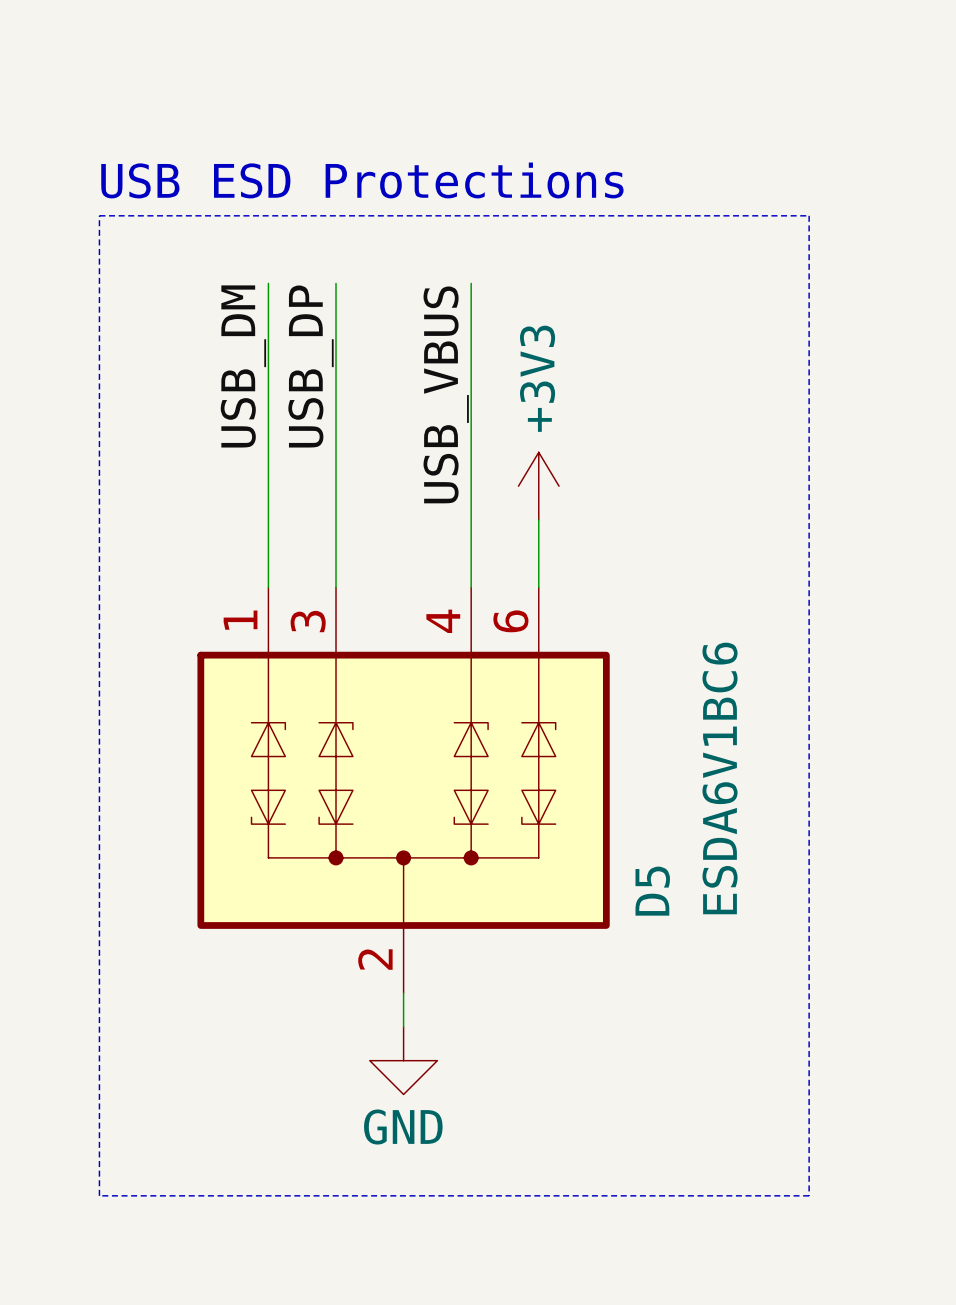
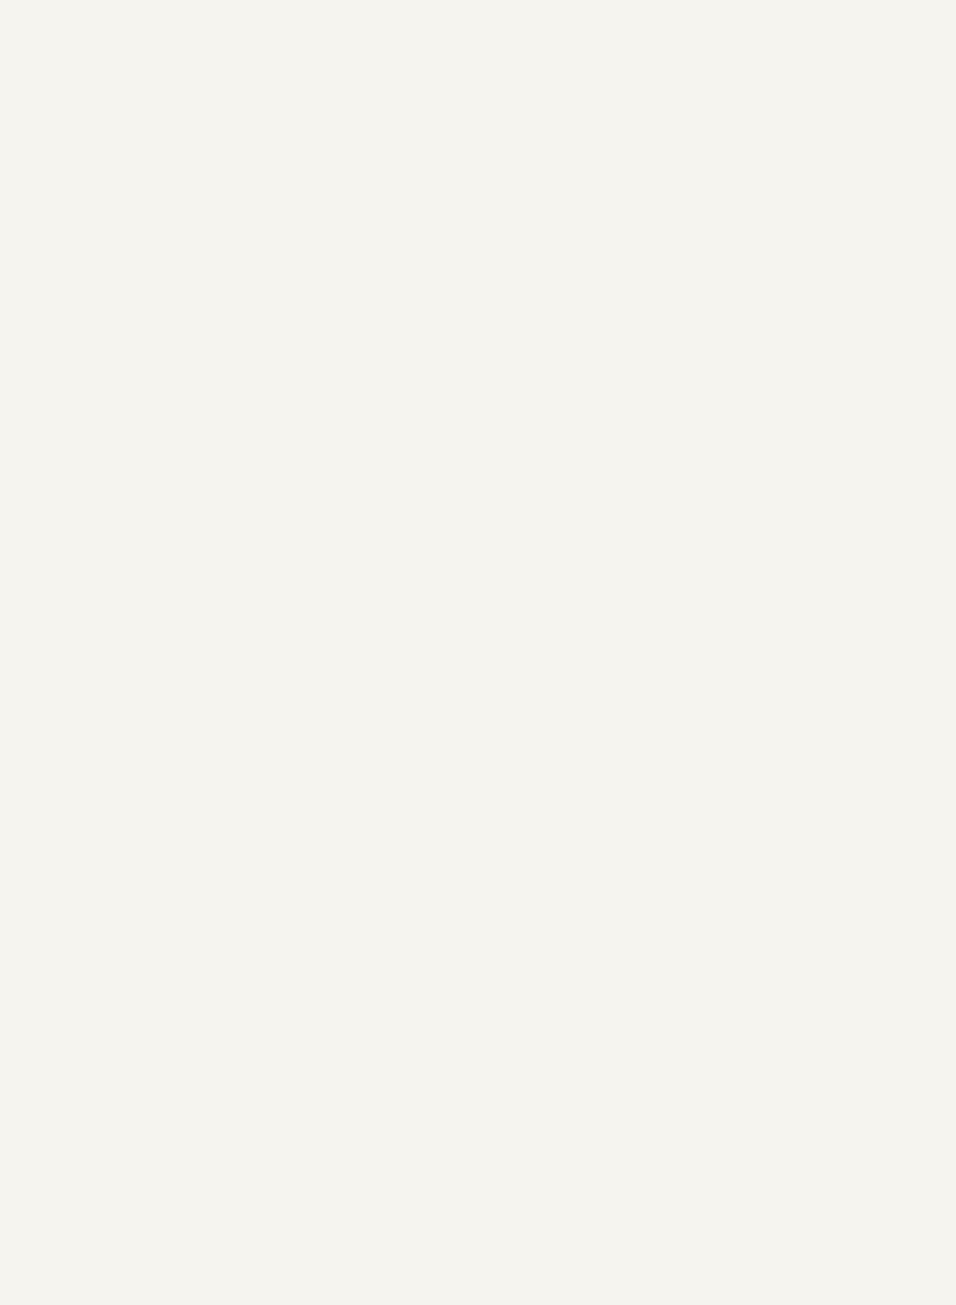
text: USB ESD Protections (362, 180) -> none
line: (99, 215) (809, 215) (809, 1195) (99, 1195) (99, 215) -> none
wire: (268, 283) (268, 587) -> none
wire: (336, 283) (336, 587) -> none
wire: (471, 283) (471, 587) -> none
label: USB_DM (243, 366) -> none
label: USB_DP (311, 366) -> none
label: USB_VBUS (446, 394) -> none
power symbol: +3V3 (538, 486) -> none
wire: (538, 519) (538, 587) -> none
D5: ESDA6V1BC6 (403, 790) -> none
wire: (403, 993) (403, 1026) -> none
power symbol: GND (403, 1060) -> none

